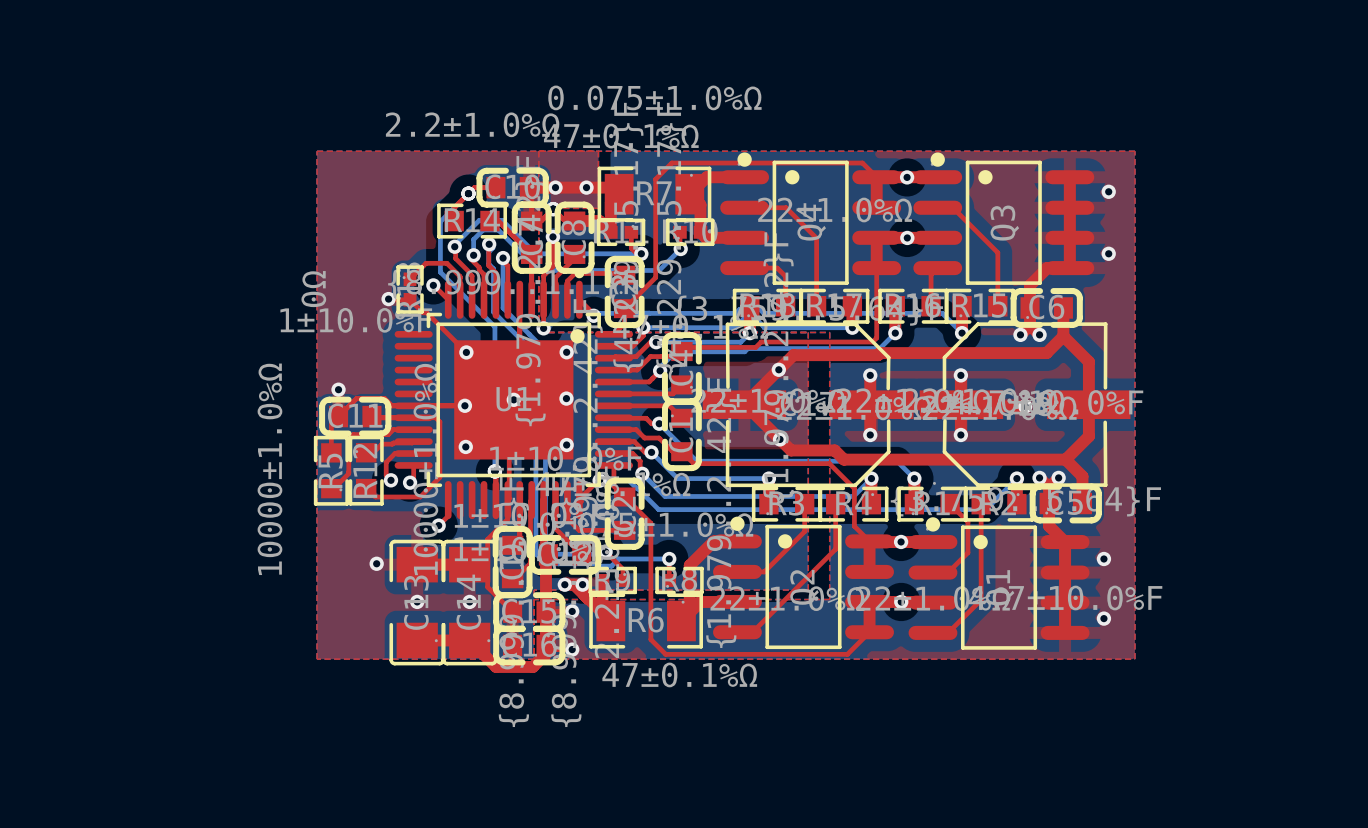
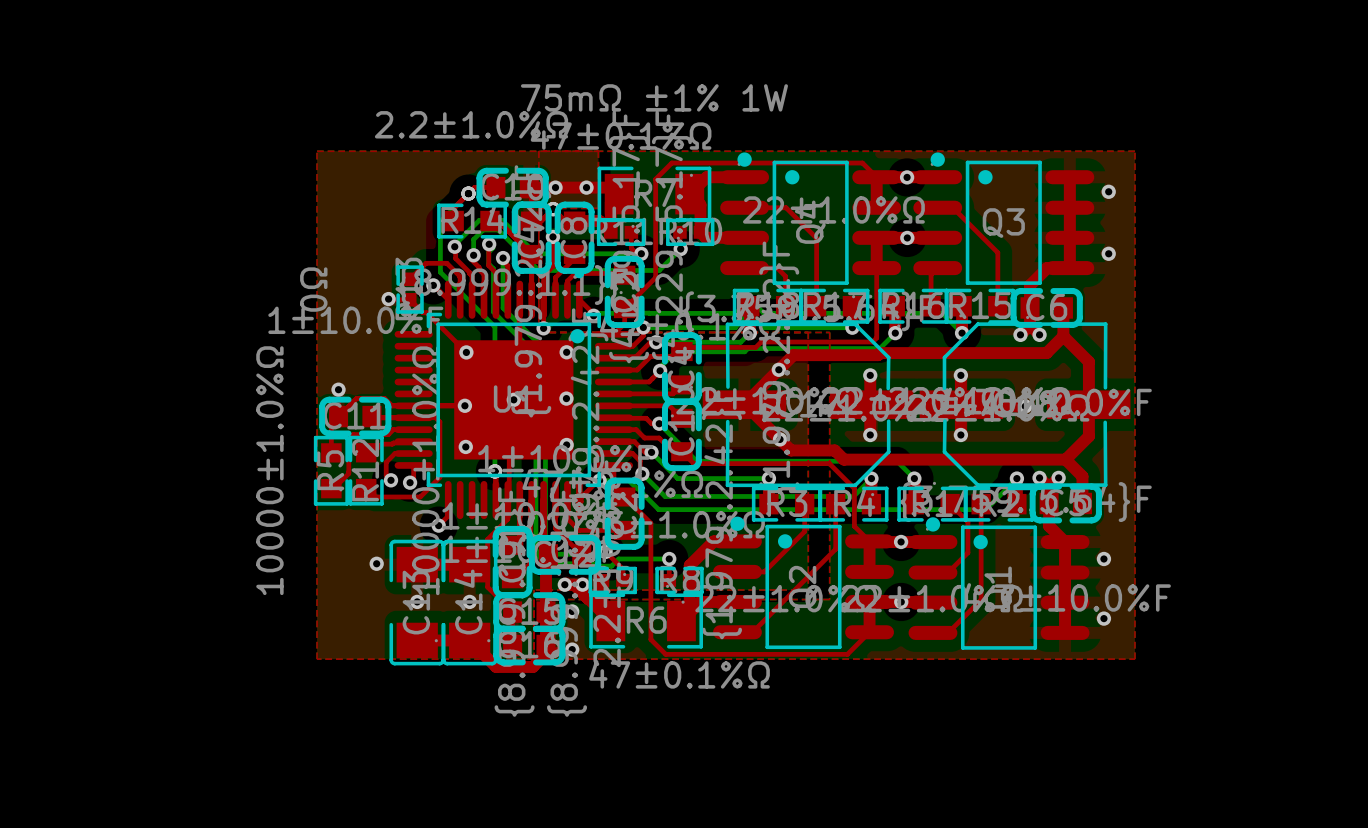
R7 value: 0.075±1.0%Ω (654, 97) -> 75mΩ ±1% 1W (654, 97)
Q3 name rotation: 0° (1004, 223) -> 90° clockwise (1003, 223)

